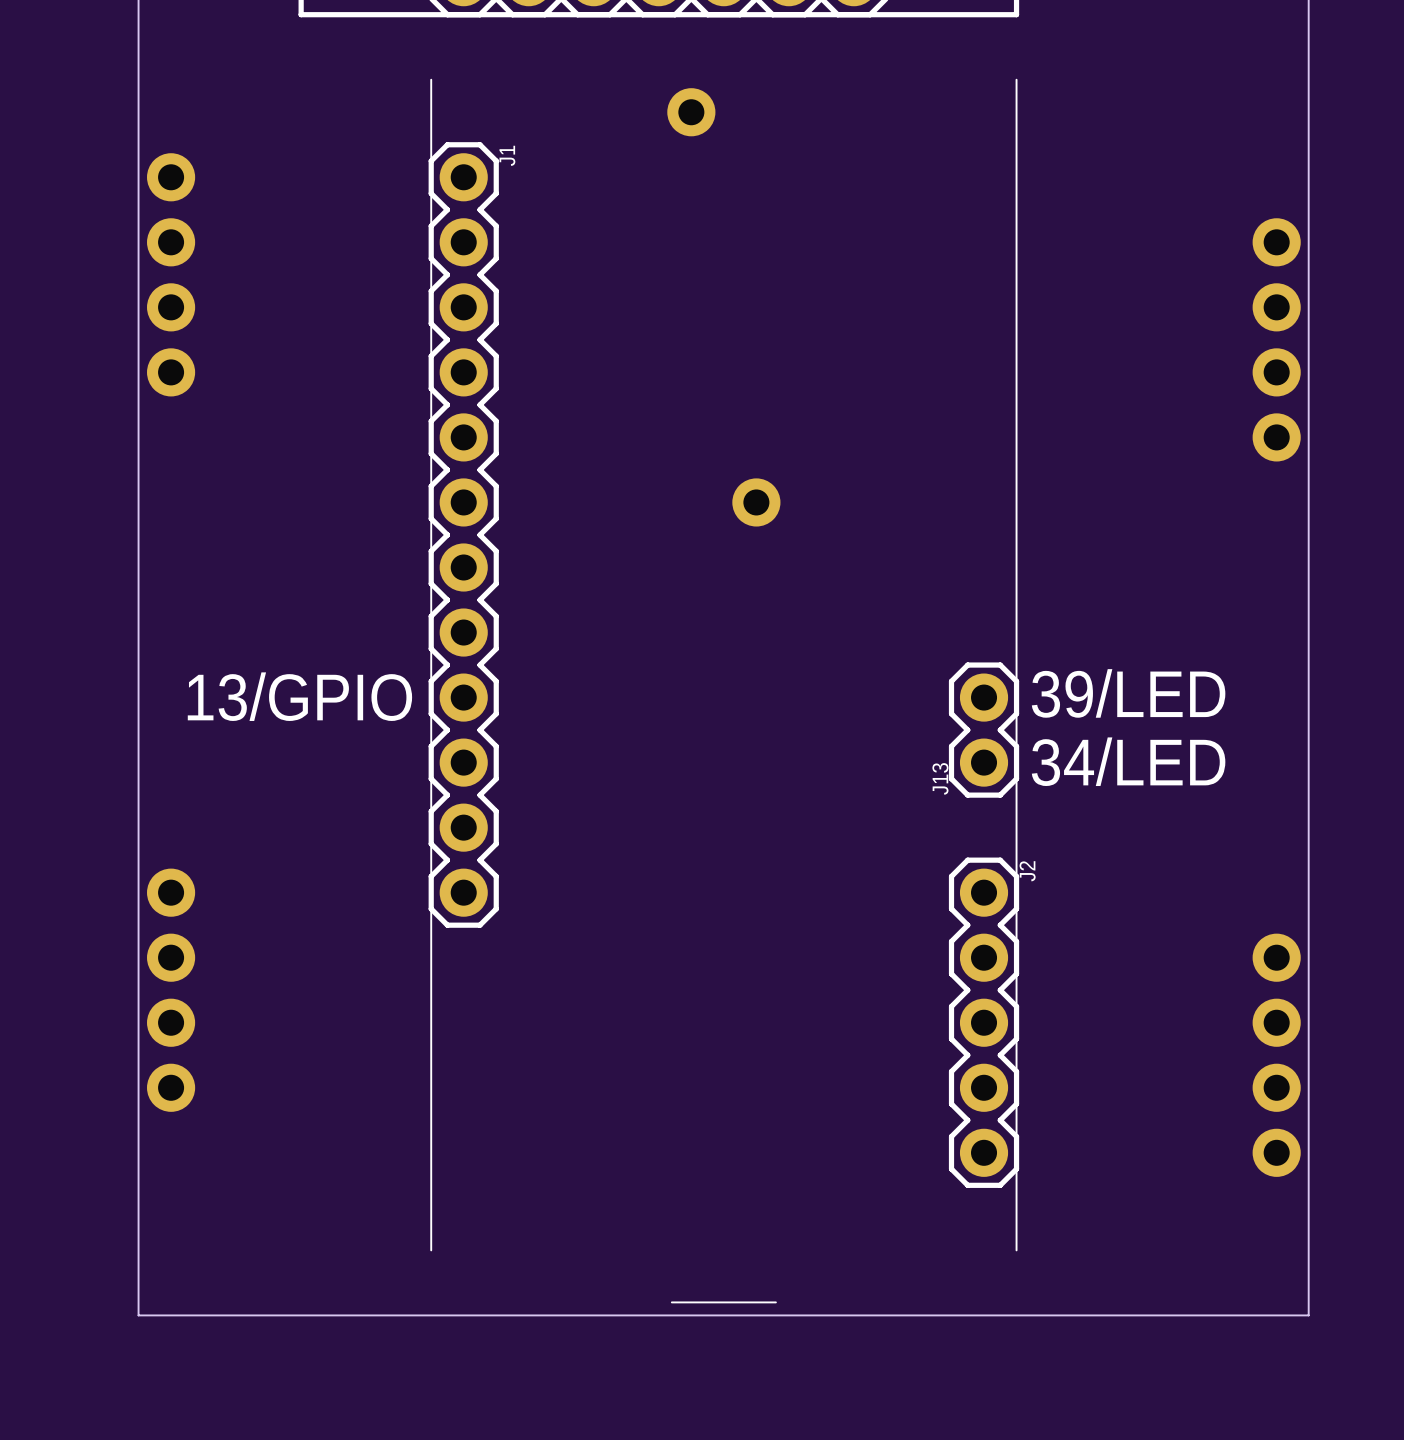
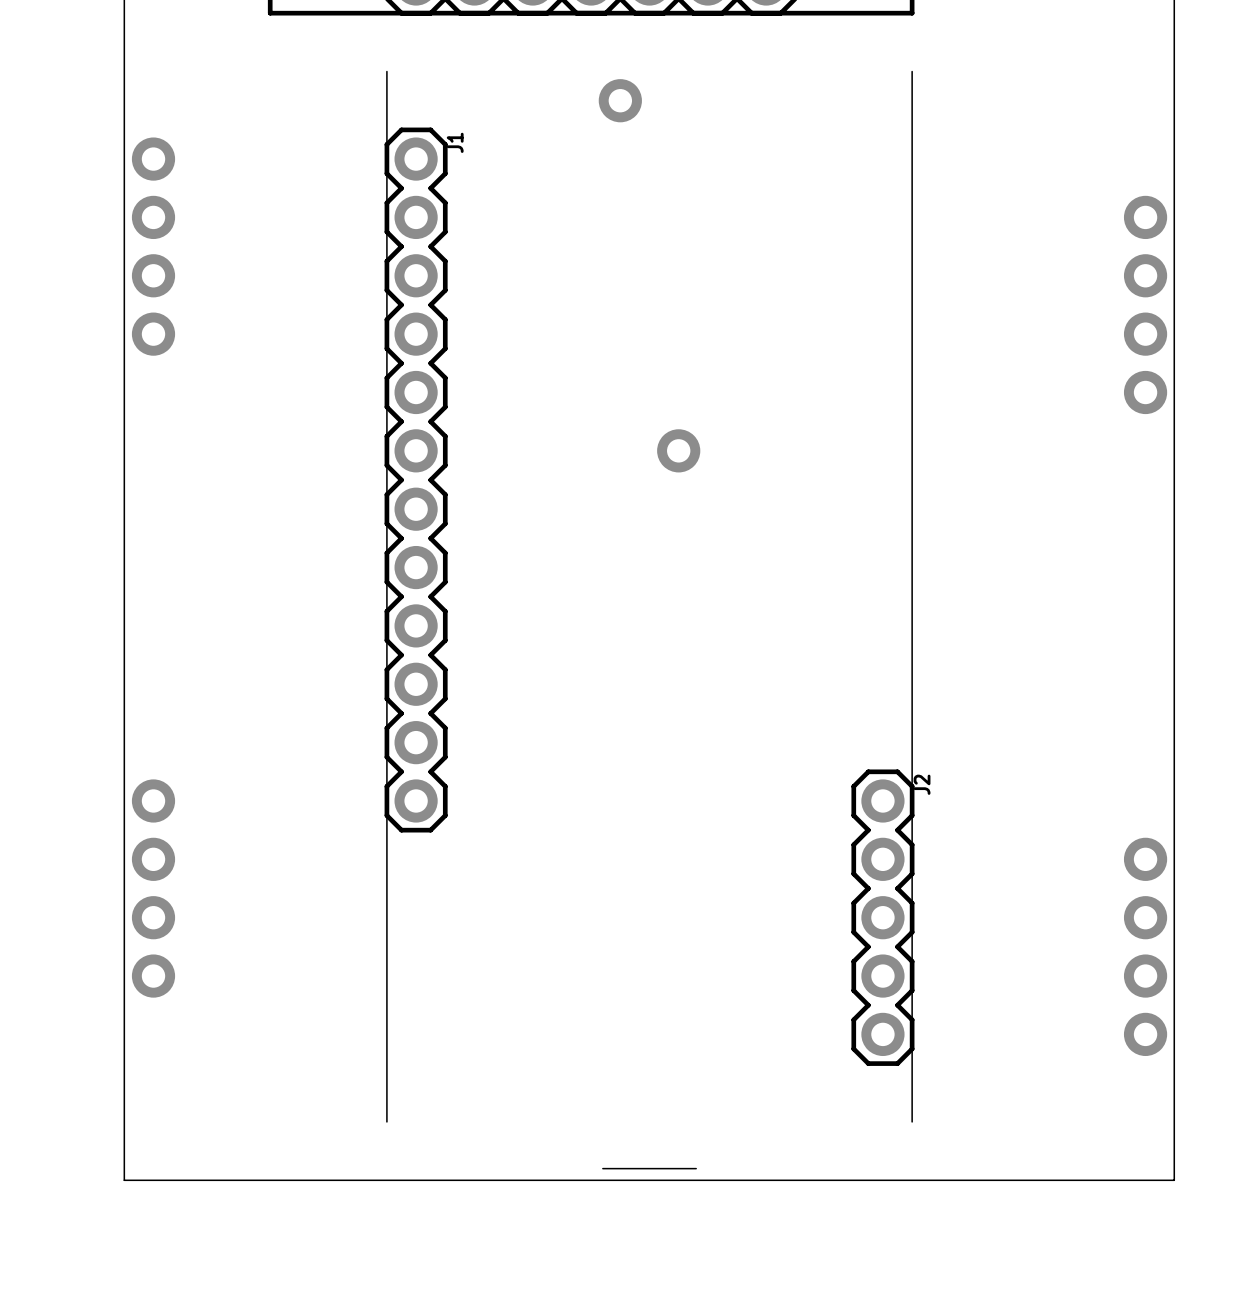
text: 39/LED (1128, 693) -> none
text: 13/GPIO (299, 696) -> none
J13: (984, 730) -> none
text: 34/LED (1128, 761) -> none

